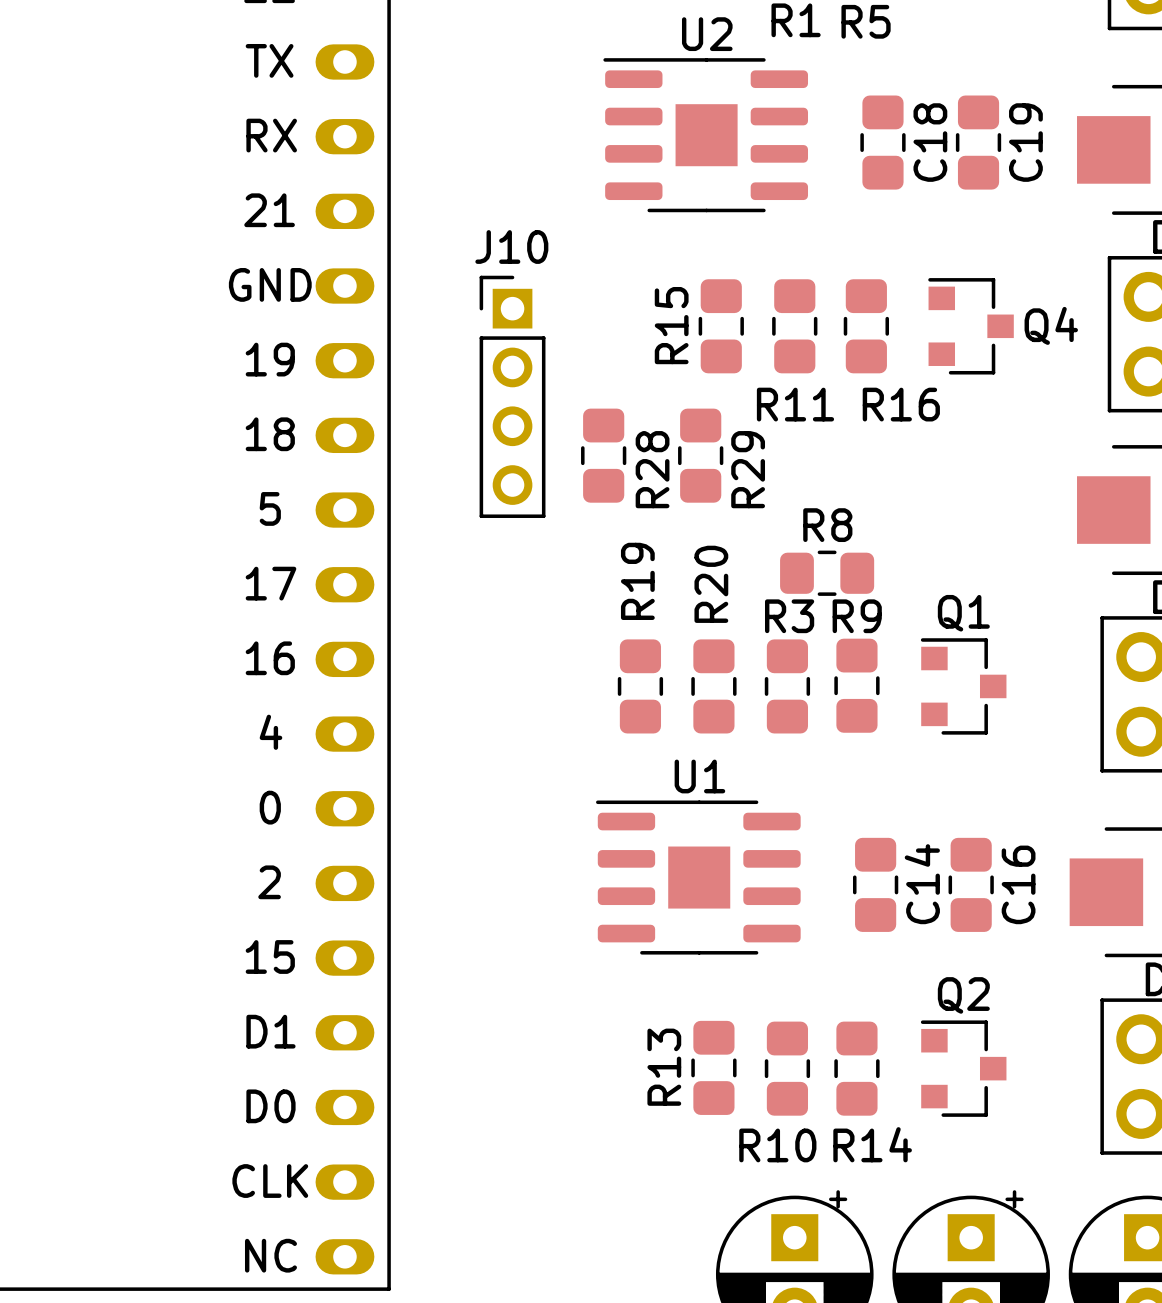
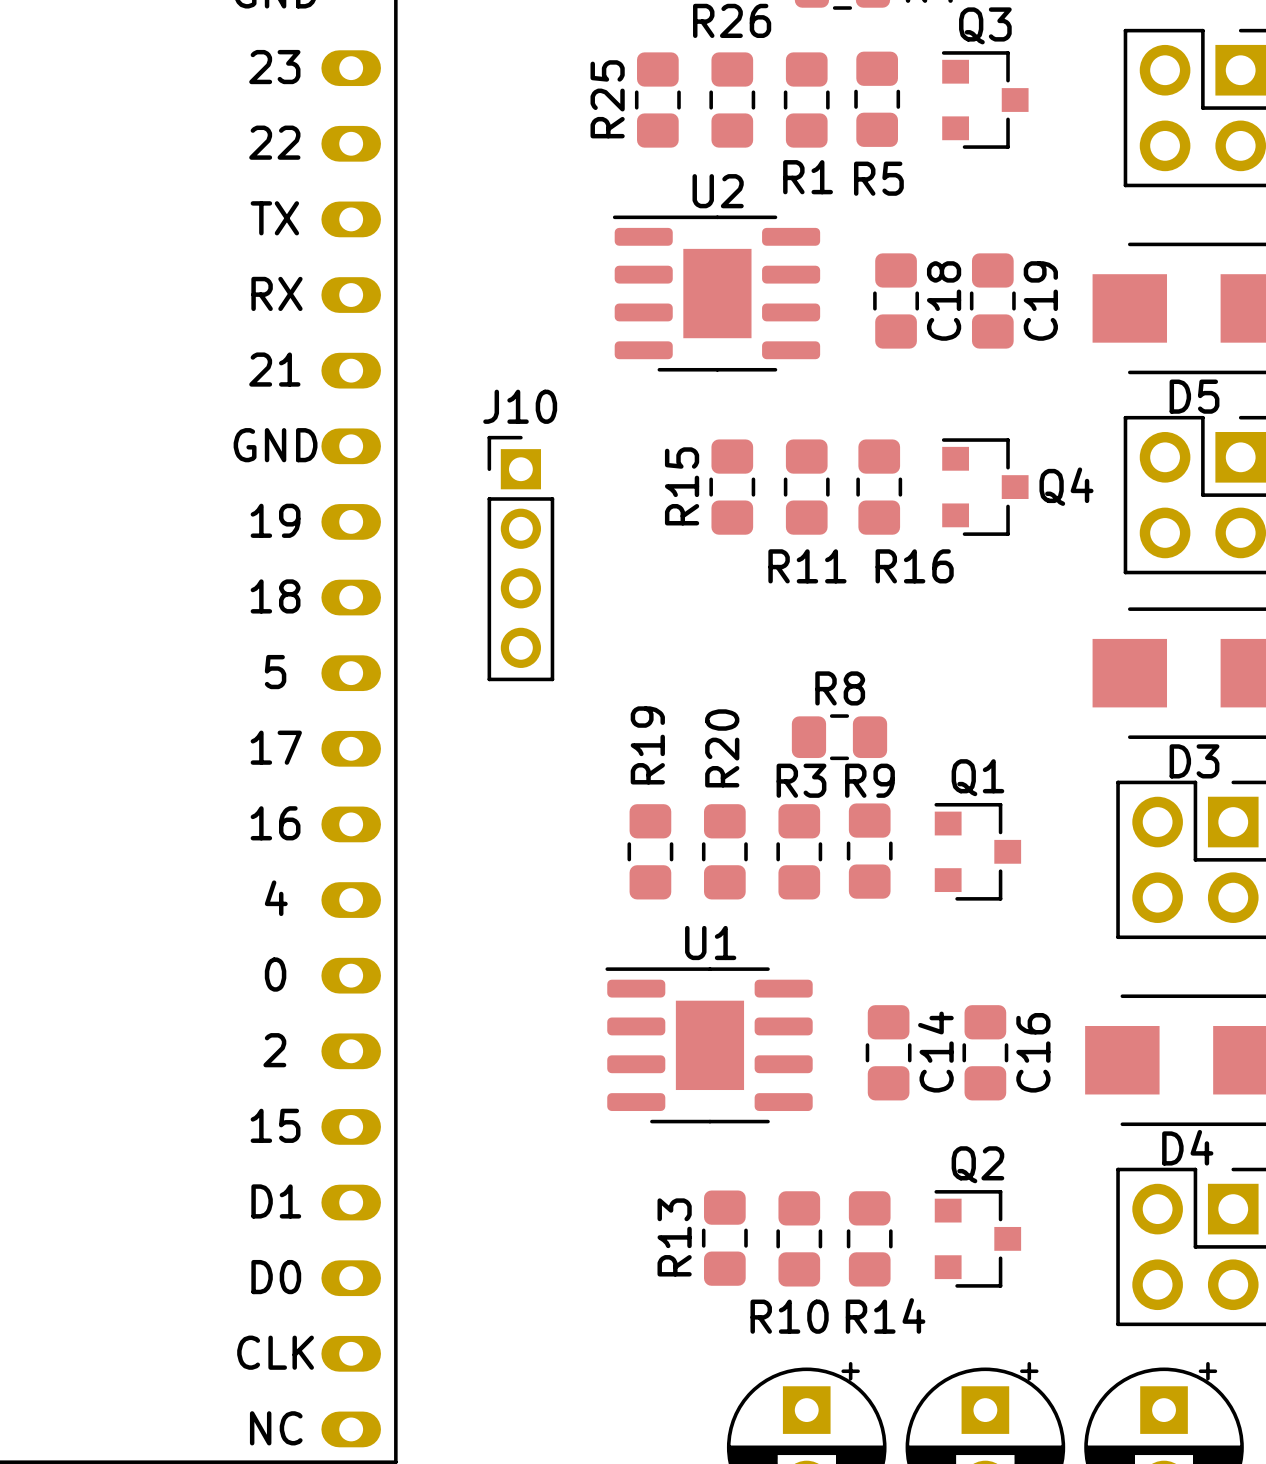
U2 footprint: [603, 58, 809, 213] -> [612, 215, 821, 372]
R28: (603, 455) -> none
R29: (700, 455) -> none
U1 footprint: [596, 800, 801, 955] -> [605, 967, 813, 1124]

